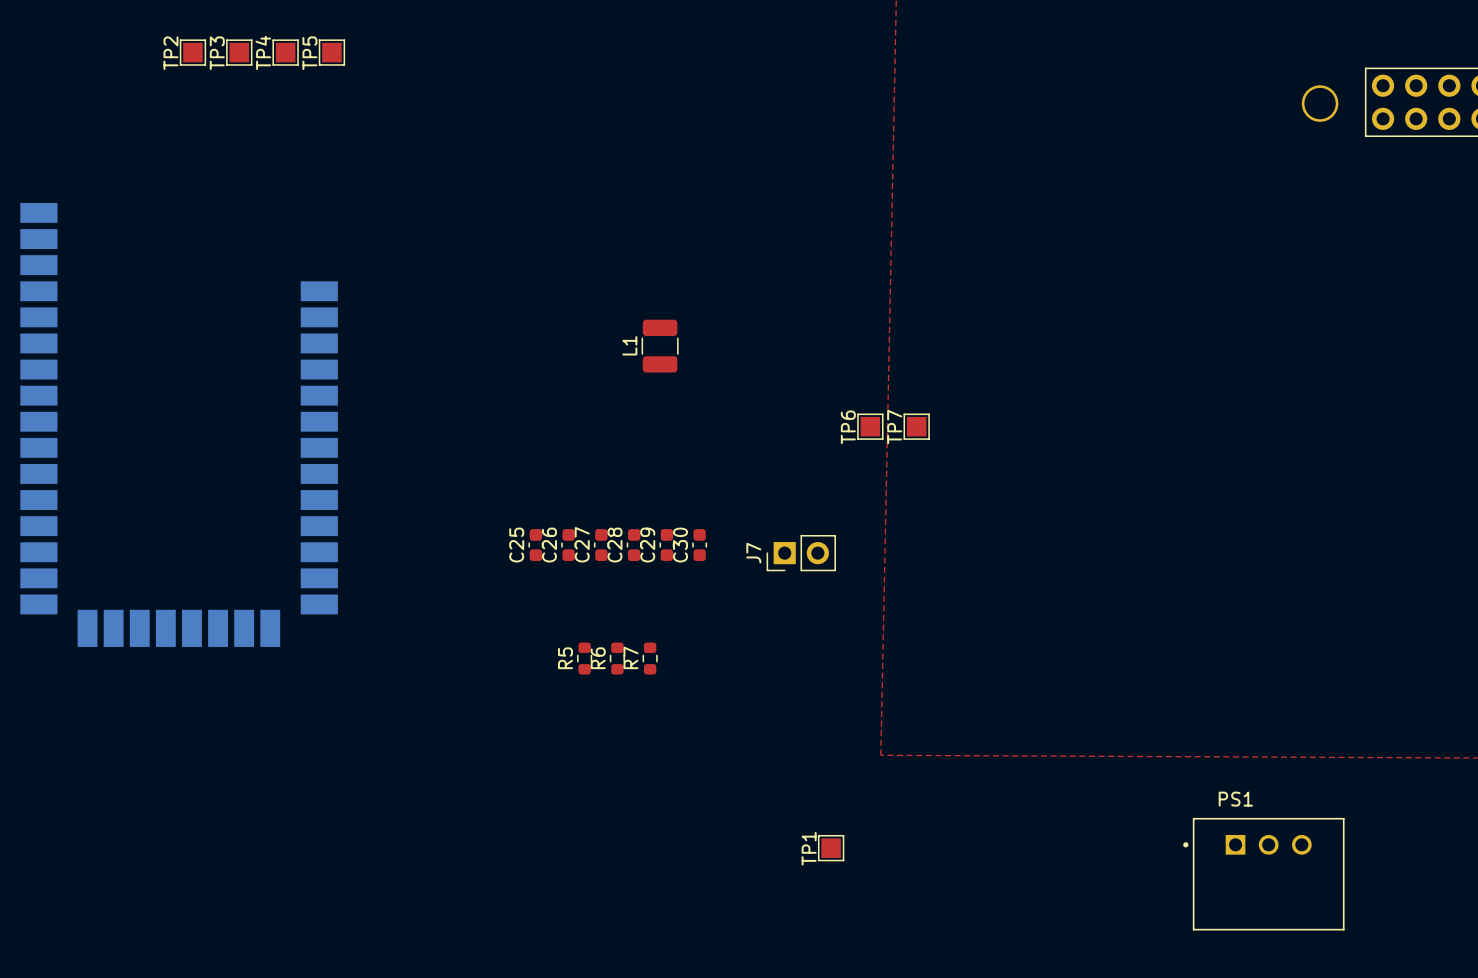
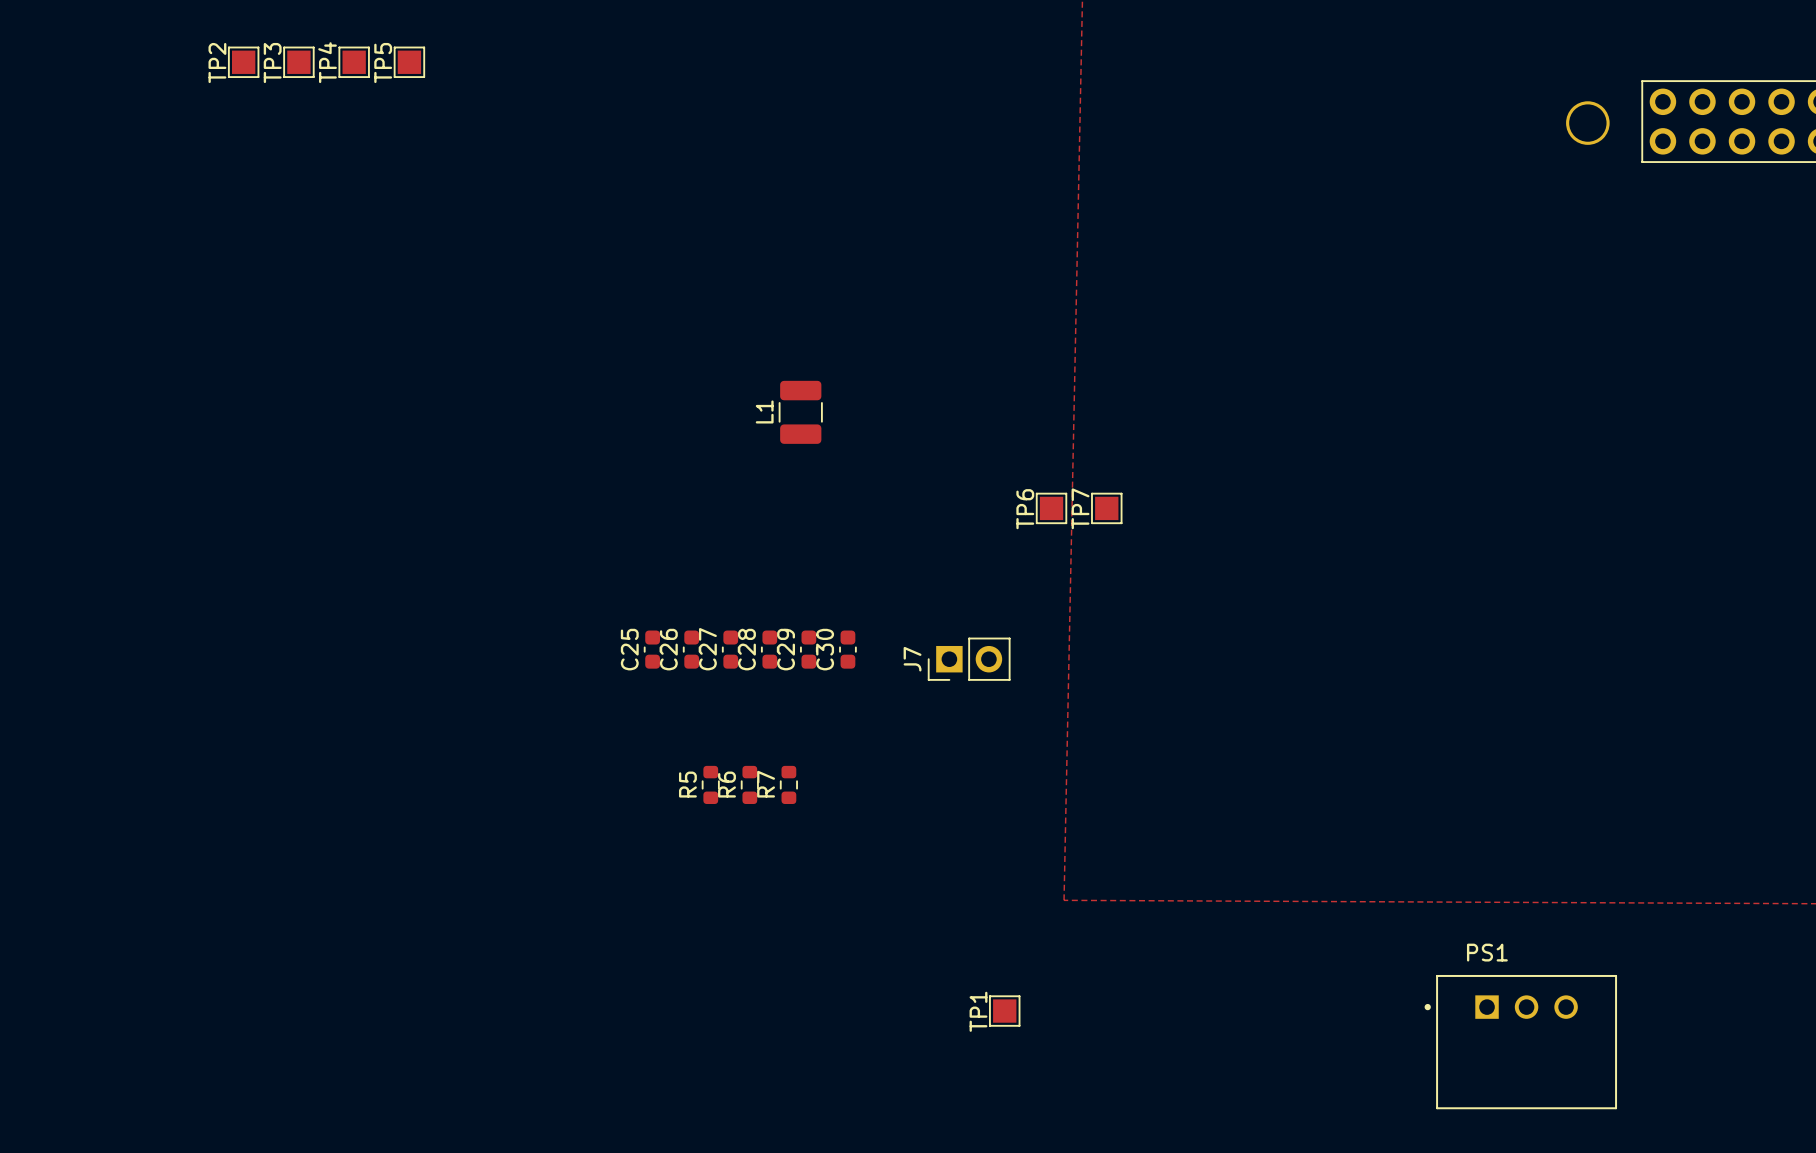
part: (179, 424) -> none

